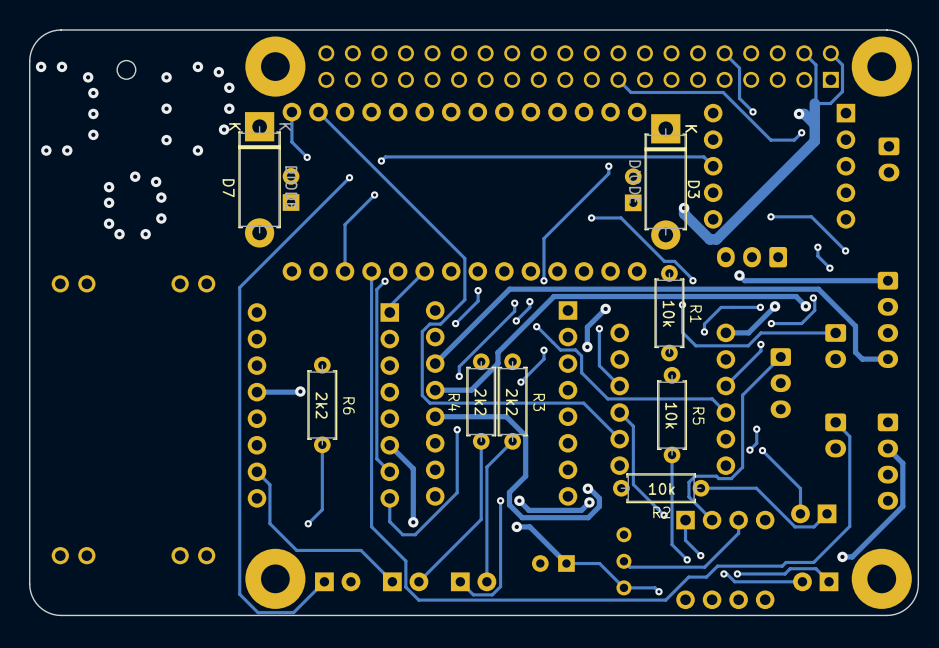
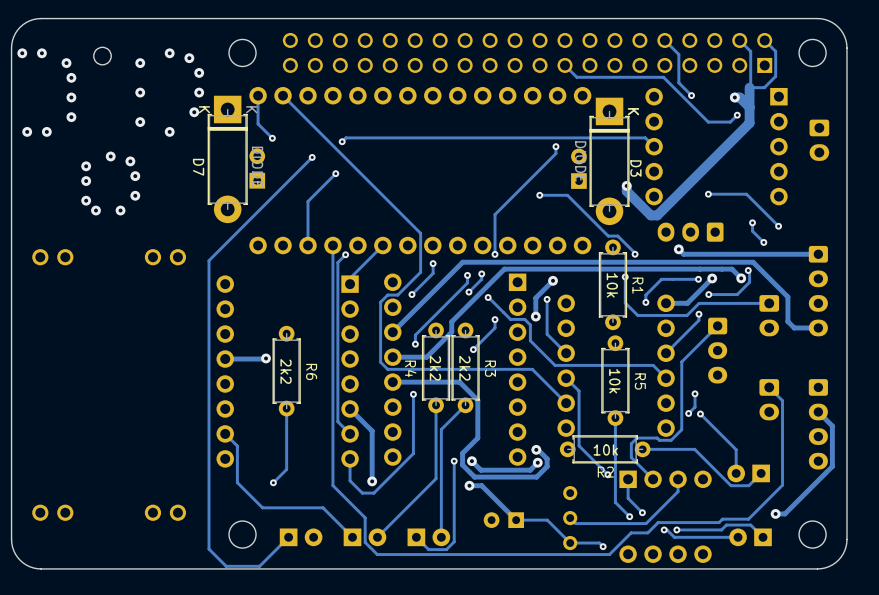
part footprint: [29, 29, 920, 617] -> [10, 17, 848, 570]

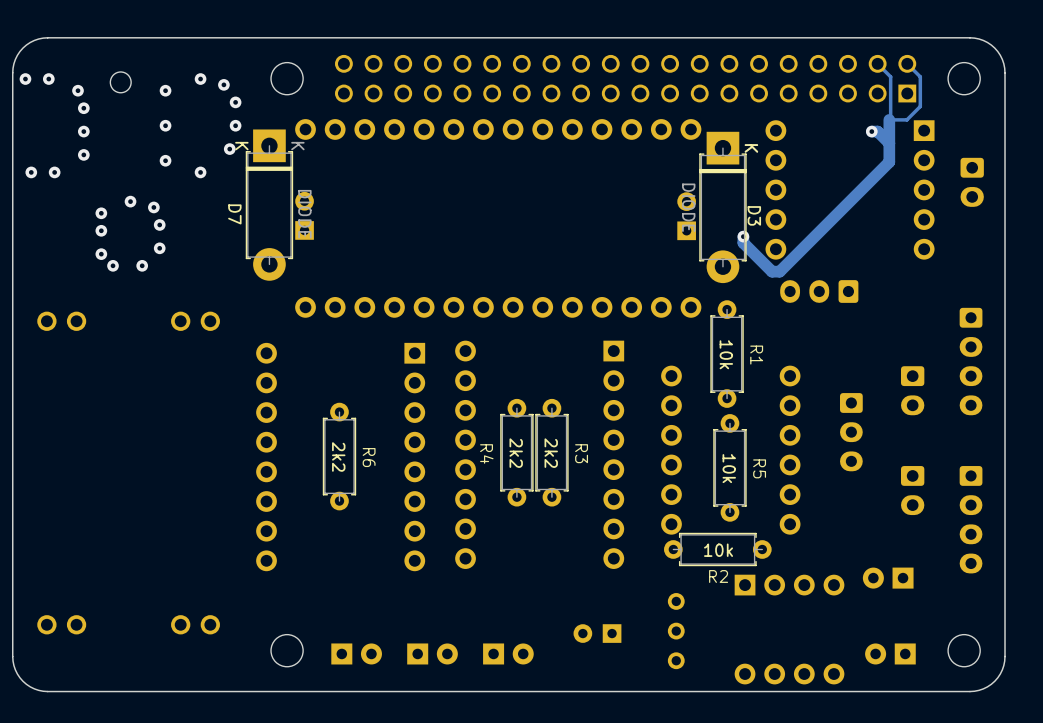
track: (664, 40) (678, 54) (678, 82) (691, 95) -> none
track: (565, 65) (576, 77) (663, 77) (708, 122) (730, 122) (737, 115) -> none
track: (258, 95) (258, 123) (272, 138) -> none
track: (283, 95) (420, 233) (420, 272) (397, 295) (387, 295) (380, 302) (380, 362) (387, 369) (532, 369) (566, 403) -> none
via: (691, 95) -> none
via: (737, 115) -> none
via: (272, 138) -> none
track: (342, 141) (346, 137) (645, 137) (654, 146) -> none
via: (342, 141) -> none
track: (555, 146) (555, 153) (495, 214) (495, 254) -> none
via: (555, 146) -> none
track: (312, 157) (209, 260) (209, 549) (226, 566) (259, 566) (288, 537) -> none
via: (312, 157) -> none
track: (335, 173) (307, 201) (307, 245) -> none
via: (335, 173) -> none
track: (708, 194) (746, 194) (778, 226) -> none
via: (708, 194) -> none
track: (539, 195) (567, 195) (608, 236) (617, 236) (635, 254) -> none
via: (539, 195) -> none
track: (752, 222) (752, 231) (763, 242) -> none
via: (752, 222) -> none
via: (778, 226) -> none
via: (763, 242) -> none
track: (332, 245) (332, 485) (365, 517) (365, 542) (377, 554) (609, 554) (631, 532) (647, 532) (658, 522) (719, 522) (722, 519) (748, 519) (782, 485) (782, 400) (769, 387) -> none
track: (382, 245) (350, 278) (350, 284) -> none
track: (678, 249) (683, 254) (818, 254) -> none
via: (678, 249) -> none
track: (345, 254) (337, 262) (337, 421) (350, 433) -> none
via: (345, 254) -> none
via: (495, 254) -> none
via: (635, 254) -> none
track: (433, 263) (433, 273) (411, 294) -> none
via: (433, 263) -> none
track: (748, 270) (749, 282) (737, 294) (708, 294) -> none
via: (748, 270) -> none
track: (481, 273) (481, 279) (468, 292) -> none
via: (481, 273) -> none
track: (467, 275) (467, 283) (415, 335) (415, 344) -> none
via: (467, 275) -> none
track: (625, 276) (625, 302) (637, 315) (687, 315) (699, 303) (769, 303) -> none
via: (625, 276) -> none
track: (712, 278) (687, 303) (666, 303) -> none
via: (712, 278) -> none
track: (741, 278) (732, 269) (504, 269) (451, 321) (451, 332) (426, 357) (392, 357) -> none
via: (741, 278) -> none
track: (698, 279) (661, 279) (645, 295) (645, 302) -> none
via: (698, 279) -> none
track: (553, 280) (535, 298) (535, 316) -> none
via: (553, 280) -> none
via: (468, 292) -> none
via: (411, 294) -> none
via: (708, 294) -> none
track: (488, 297) (510, 319) (524, 319) (530, 325) (530, 340) (555, 365) (653, 365) (666, 378) -> none
via: (488, 297) -> none
track: (547, 299) (547, 334) (566, 353) -> none
via: (547, 299) -> none
via: (645, 302) -> none
track: (698, 314) (698, 320) (666, 353) -> none
via: (698, 314) -> none
via: (535, 316) -> none
track: (495, 319) (495, 327) (473, 349) -> none
via: (495, 319) -> none
track: (717, 326) (681, 361) (681, 429) (671, 440) (637, 438) (631, 443) (631, 457) (653, 479) -> none
track: (818, 327) (794, 327) (787, 321) (787, 297) (753, 262) (462, 262) (392, 332) -> none
via: (415, 344) -> none
via: (473, 349) -> none
track: (266, 358) (225, 359) -> none
via: (266, 358) -> none
track: (566, 378) (579, 391) (579, 445) (607, 474) -> none
track: (392, 382) (459, 382) (477, 400) (477, 438) (462, 453) (462, 465) (474, 477) (536, 477) (547, 466) (547, 458) (536, 449) -> none
track: (695, 393) (695, 407) (688, 413) -> none
via: (695, 393) -> none
track: (413, 394) (413, 453) (373, 493) (362, 493) (350, 480) (350, 458) -> none
via: (413, 394) -> none
track: (436, 405) (436, 478) (377, 537) -> none
track: (465, 405) (441, 429) (441, 537) -> none
track: (286, 408) (286, 469) (273, 482) -> none
track: (350, 408) (372, 431) (372, 481) -> none
track: (818, 412) (832, 426) (832, 466) (784, 513) (775, 513) -> none
via: (688, 413) -> none
track: (700, 413) (736, 449) (736, 473) -> none
via: (700, 413) -> none
track: (615, 418) (615, 502) (629, 516) -> none
track: (225, 433) (237, 446) (237, 482) (262, 507) (323, 507) (352, 537) -> none
via: (536, 449) -> none
track: (642, 449) (694, 449) (731, 485) (748, 485) (761, 473) -> none
track: (454, 461) (454, 541) (446, 549) (428, 549) (416, 537) -> none
via: (454, 461) -> none
track: (471, 461) (480, 470) (530, 470) (537, 462) -> none
via: (471, 461) -> none
via: (537, 462) -> none
via: (607, 474) -> none
track: (628, 479) (628, 498) (642, 512) -> none
track: (678, 479) (678, 491) (646, 523) (575, 523) (570, 518) -> none
via: (372, 481) -> none
via: (273, 482) -> none
track: (469, 485) (481, 485) (516, 520) (547, 520) (570, 543) (599, 543) (603, 546) -> none
via: (469, 485) -> none
via: (642, 512) -> none
via: (775, 513) -> none
via: (629, 516) -> none
track: (664, 529) (667, 529) (674, 537) (738, 537) -> none
via: (664, 529) -> none
track: (676, 529) (721, 529) (726, 525) (750, 525) (763, 537) -> none
via: (676, 529) -> none
via: (603, 546) -> none

